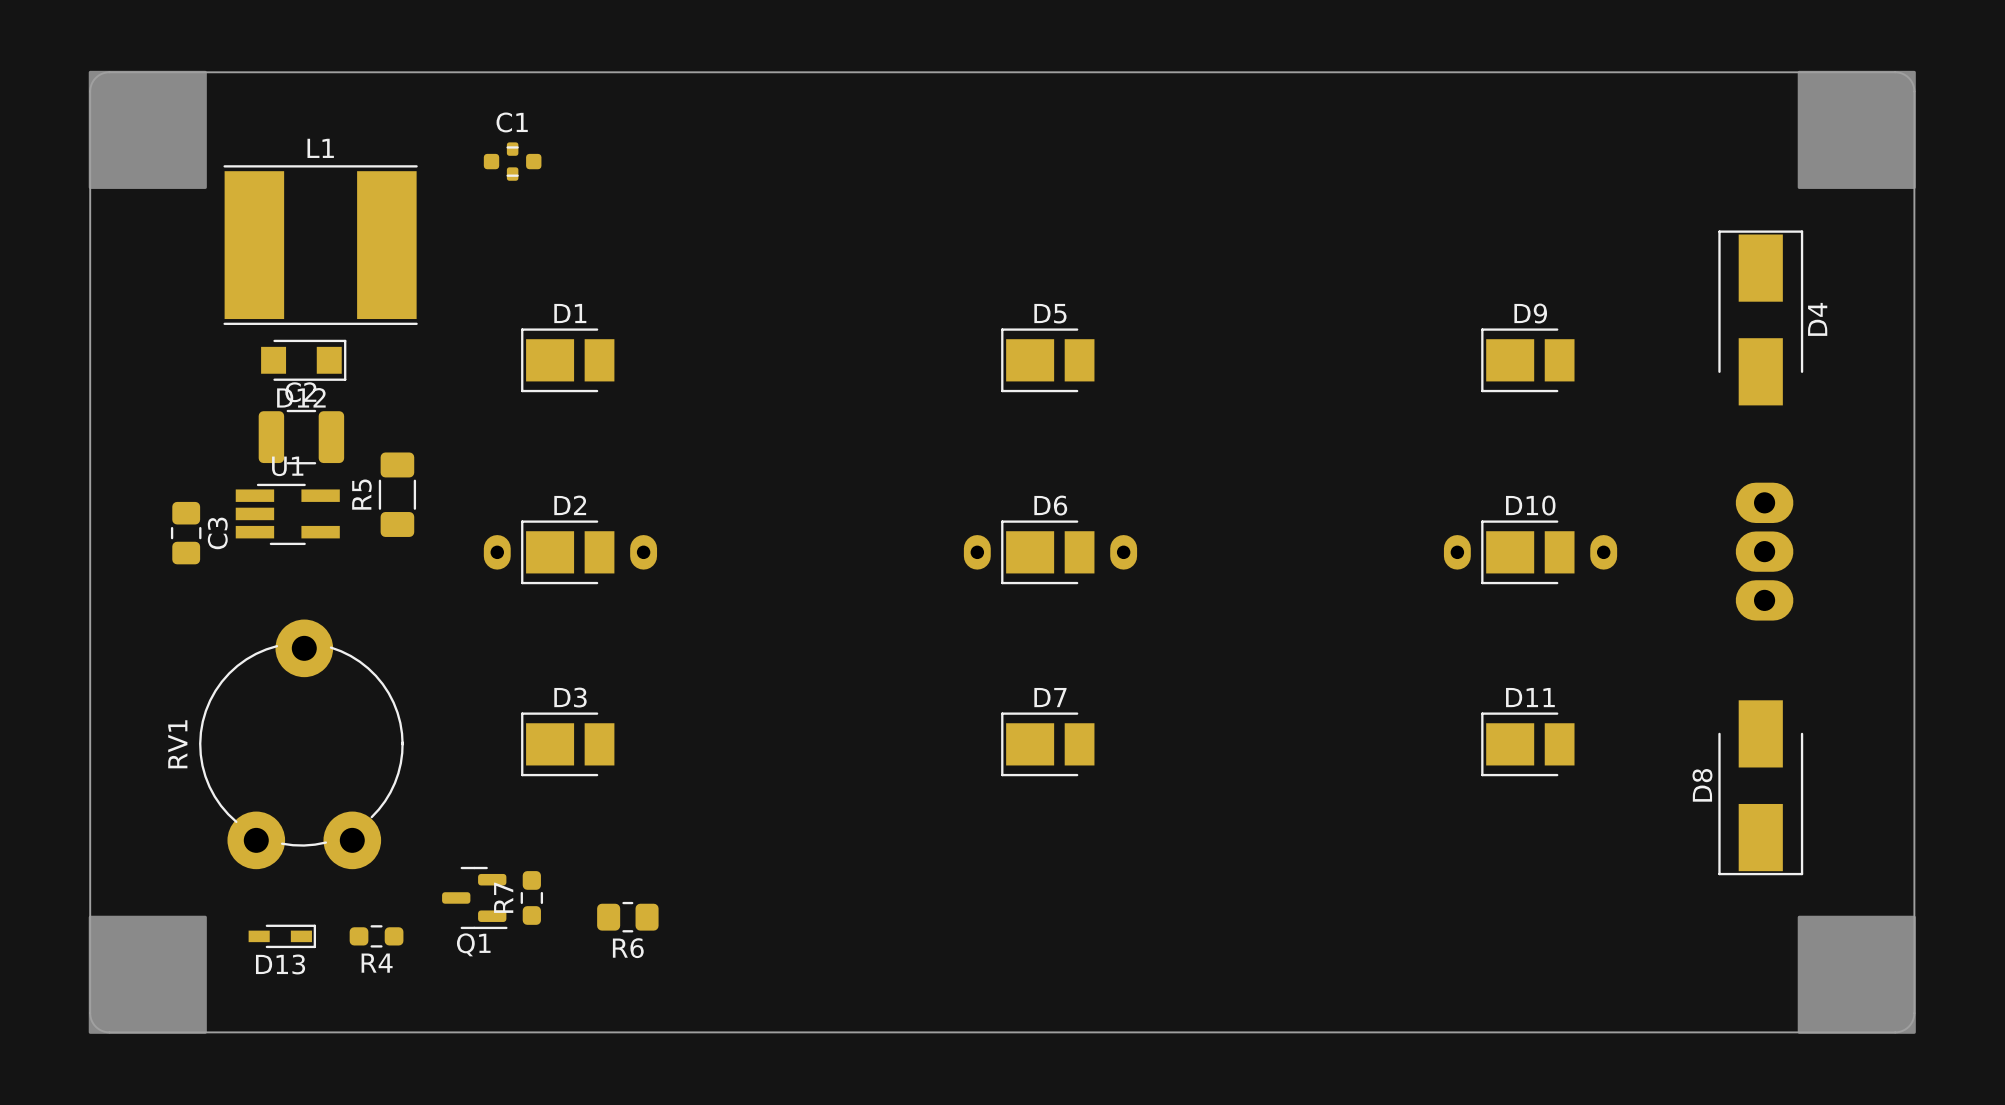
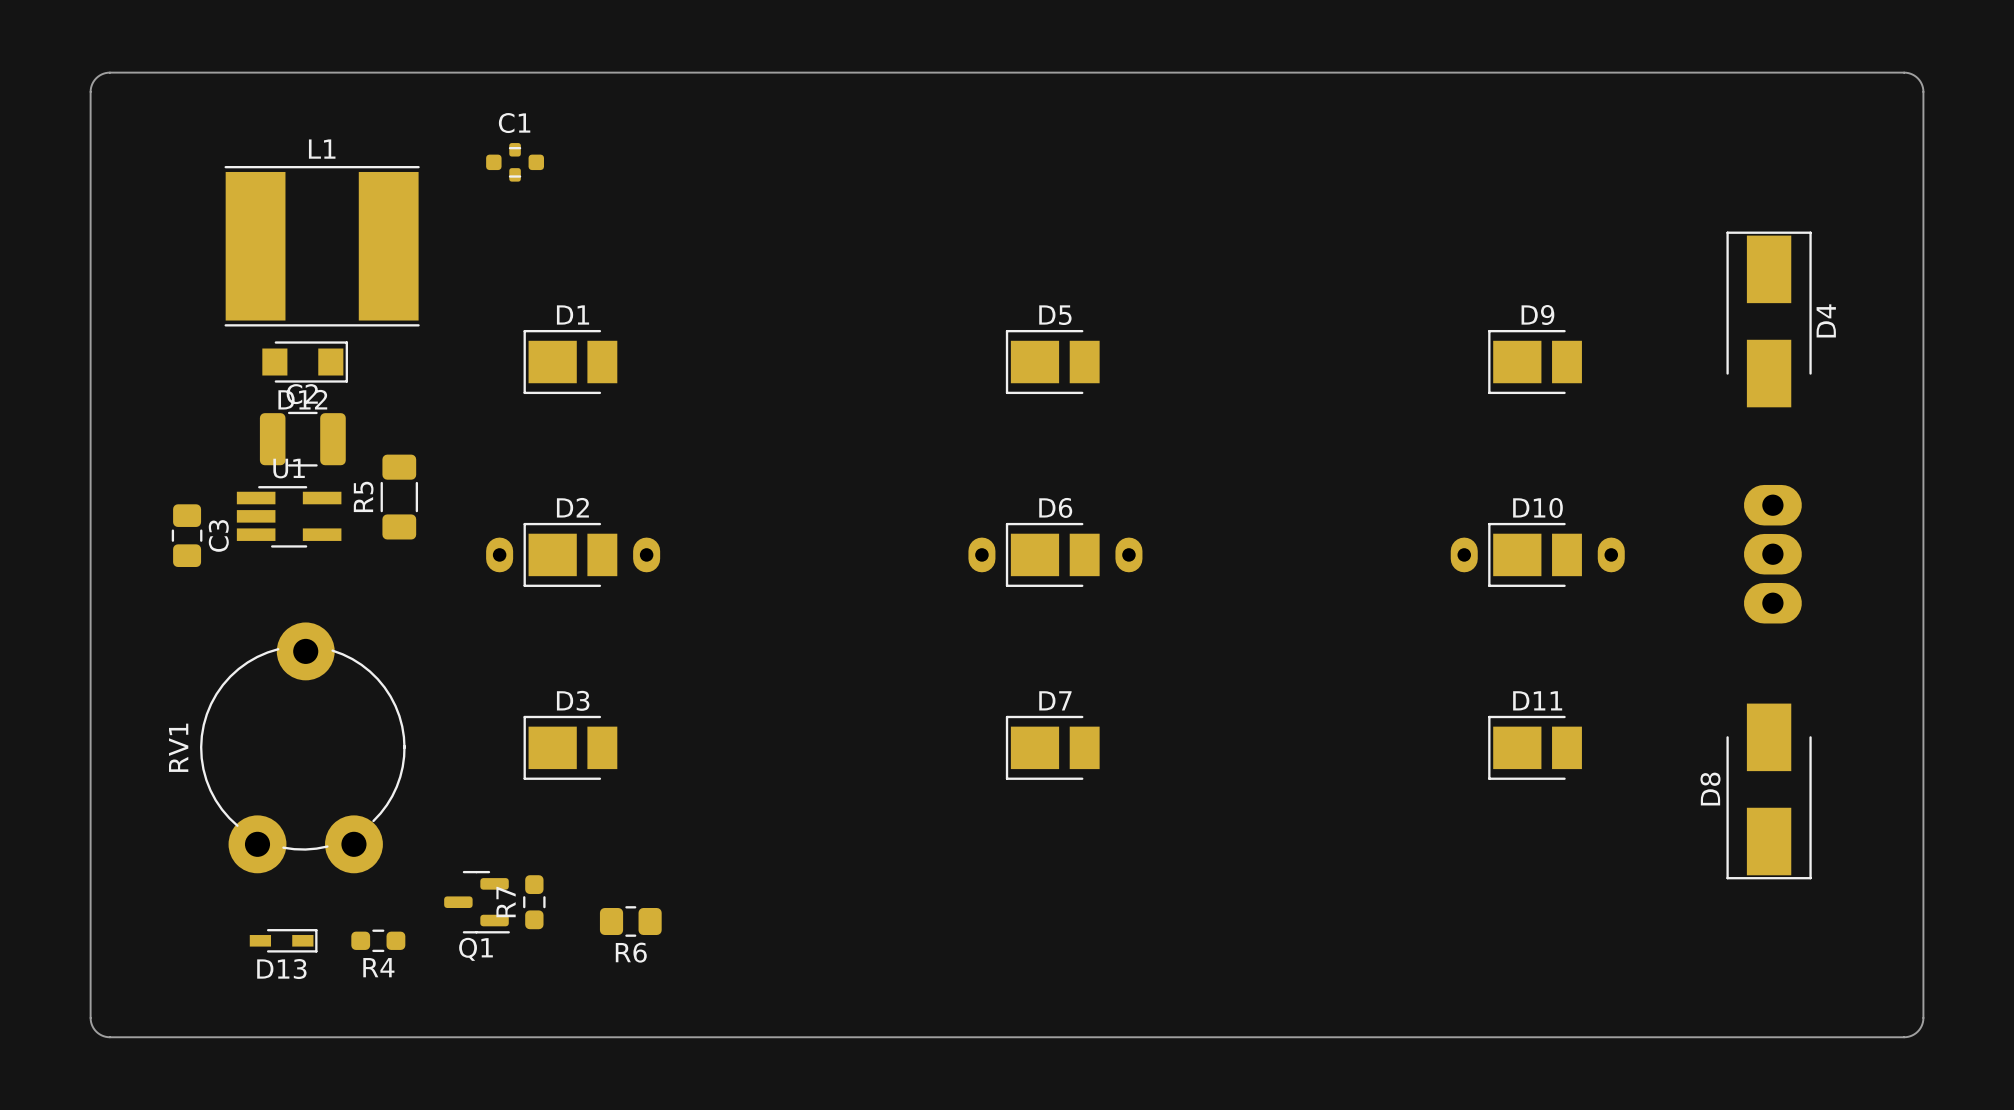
drawing: [88, 70, 207, 189] -> none
drawing: [1797, 70, 1916, 189] -> none
drawing: [88, 915, 207, 1034] -> none
drawing: [1797, 915, 1916, 1034] -> none

